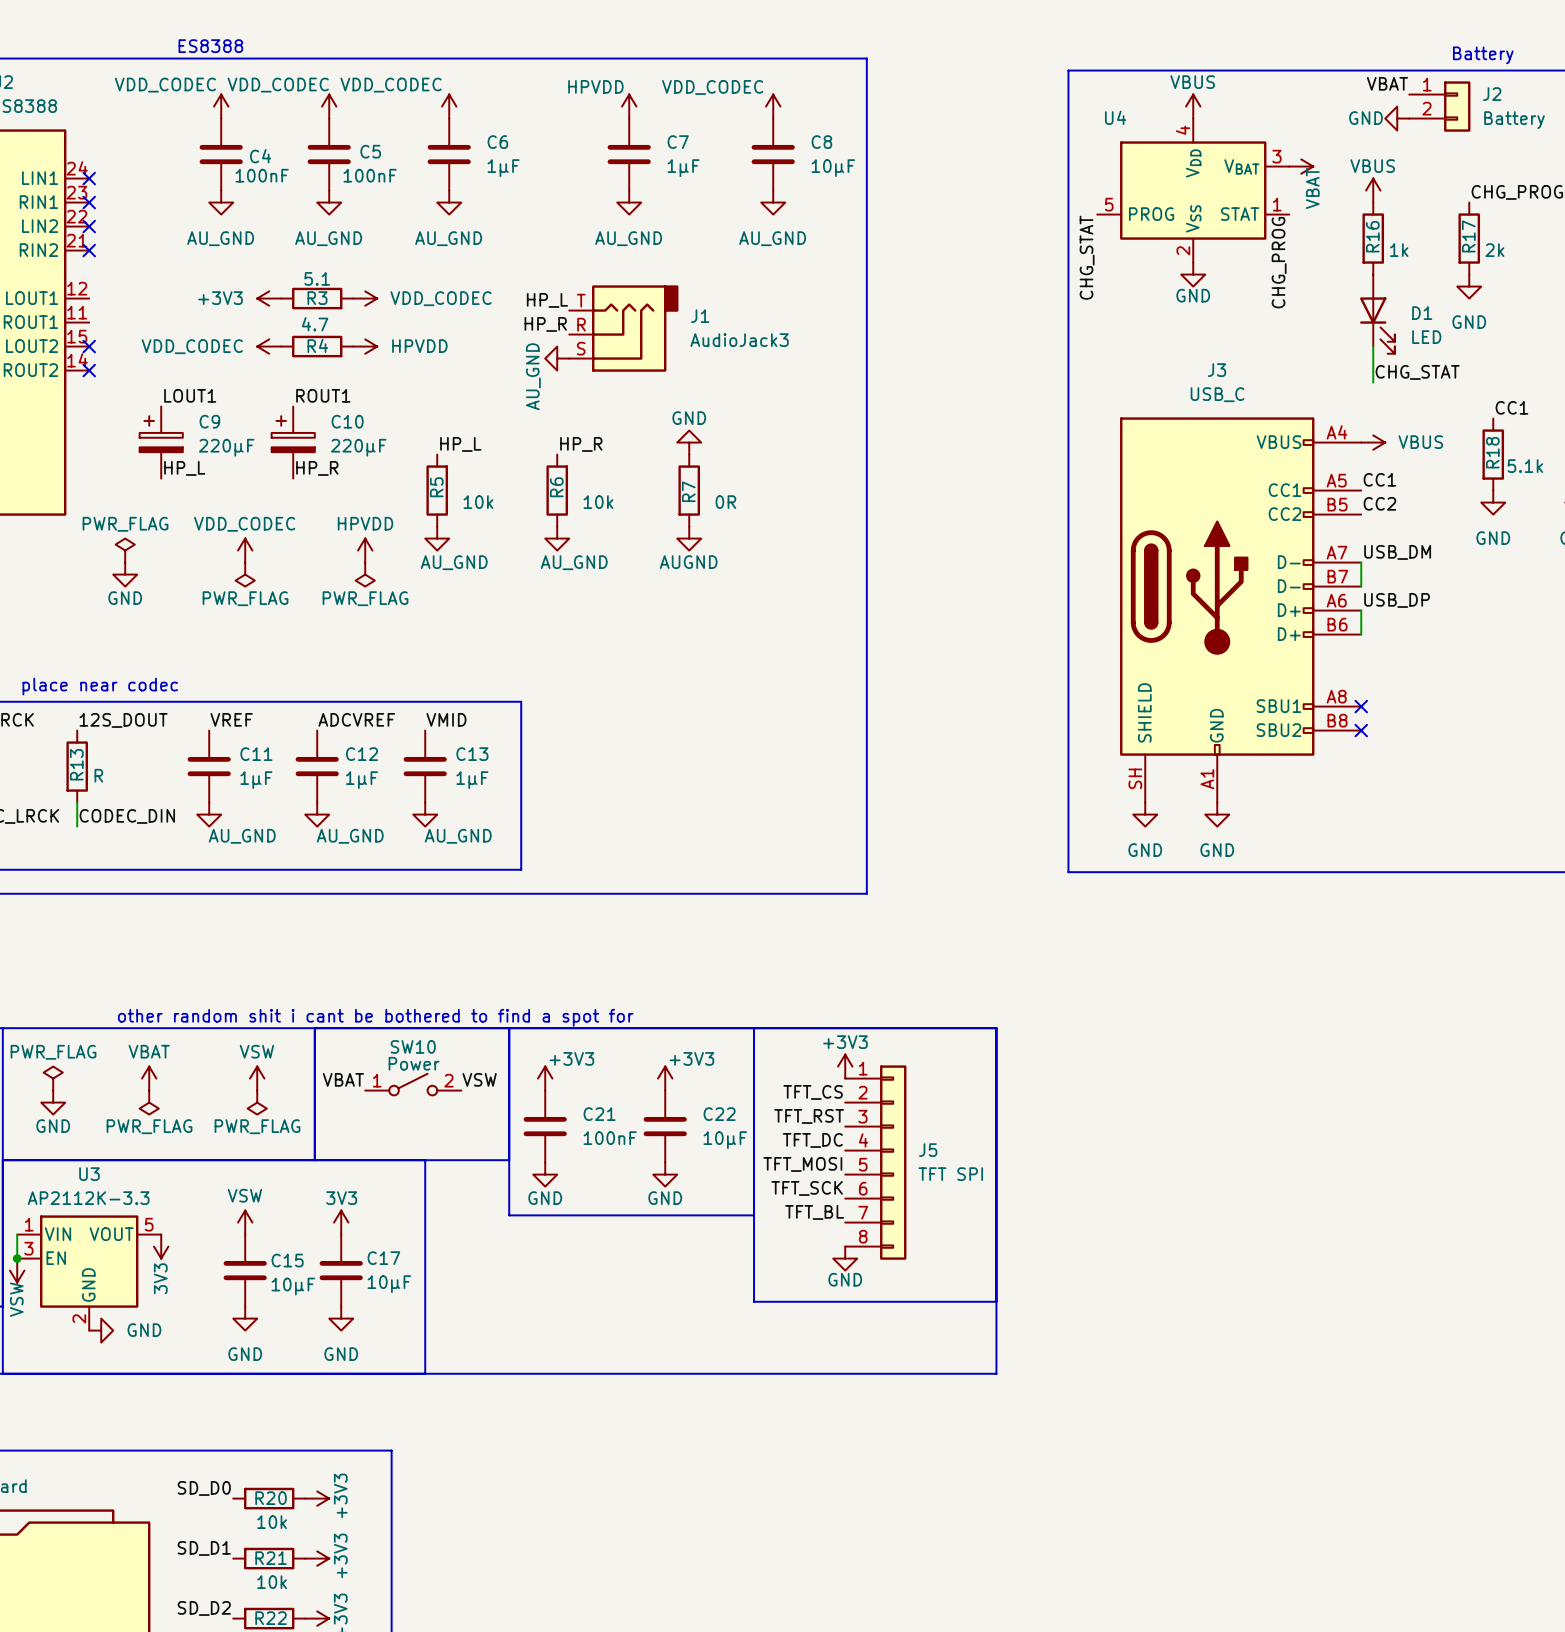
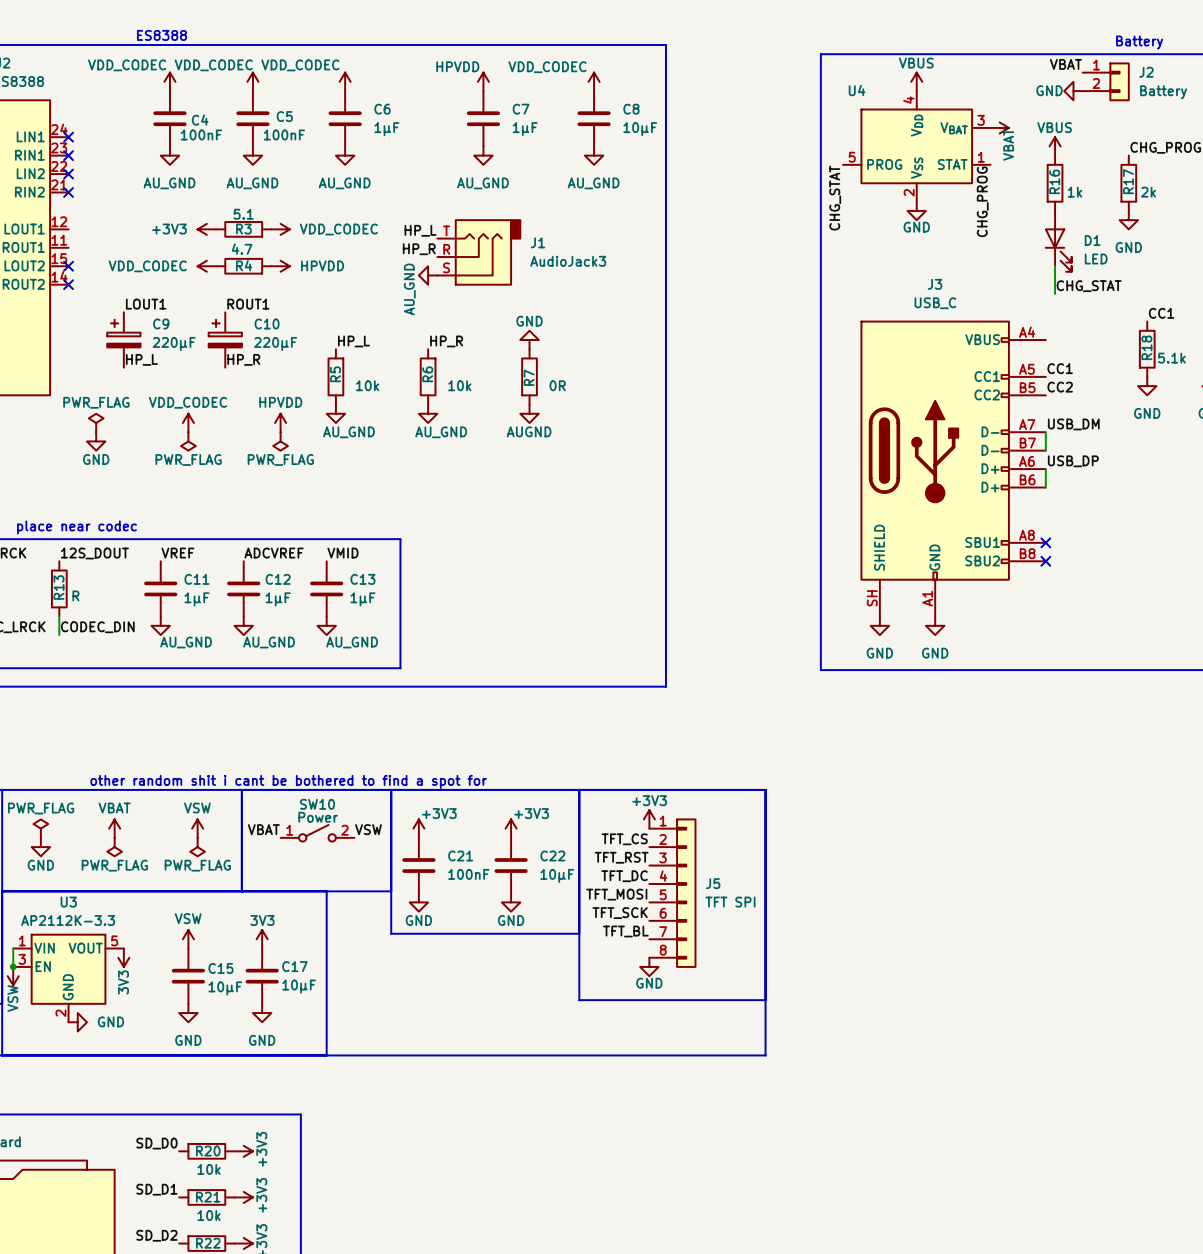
power symbol: VBUS (1373, 442) -> none

